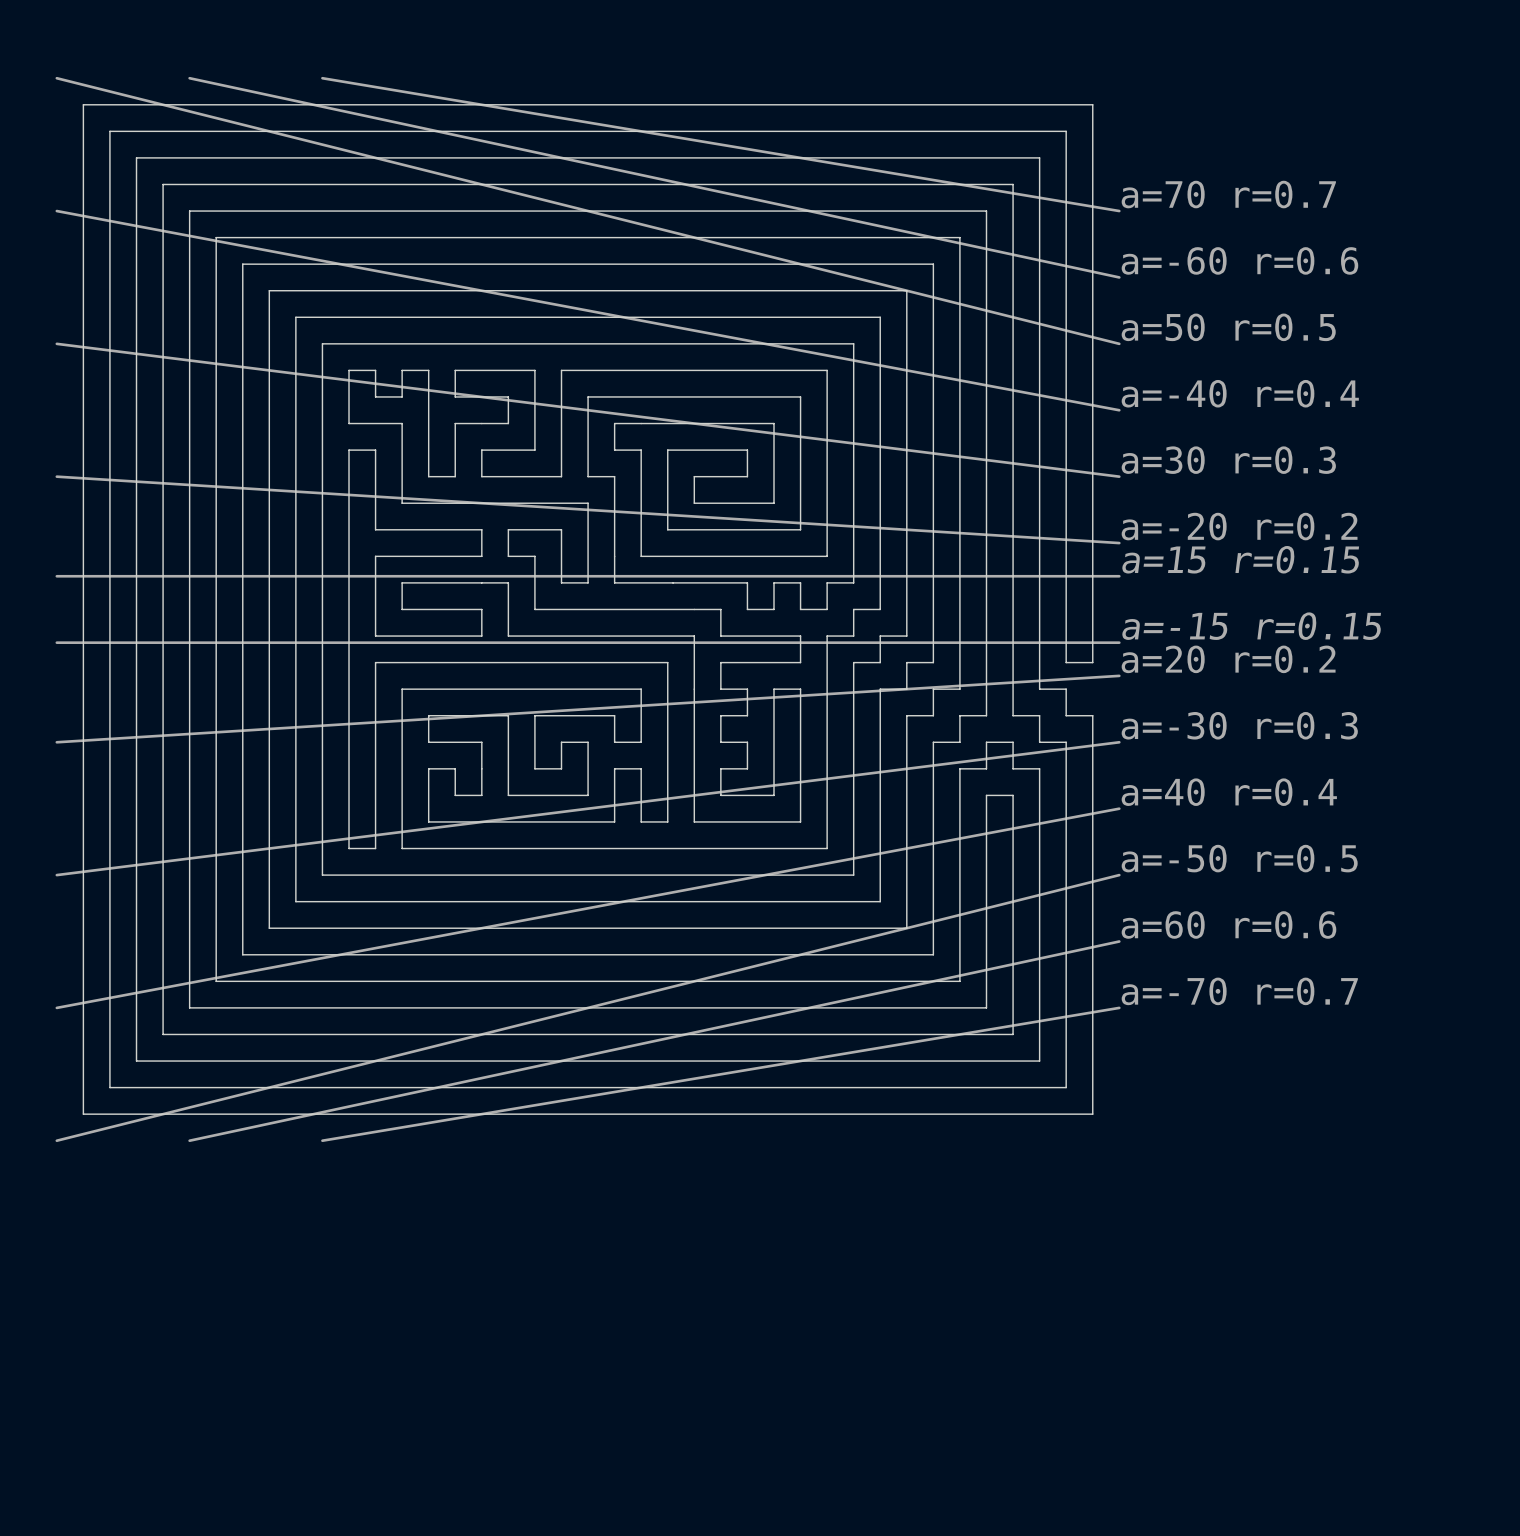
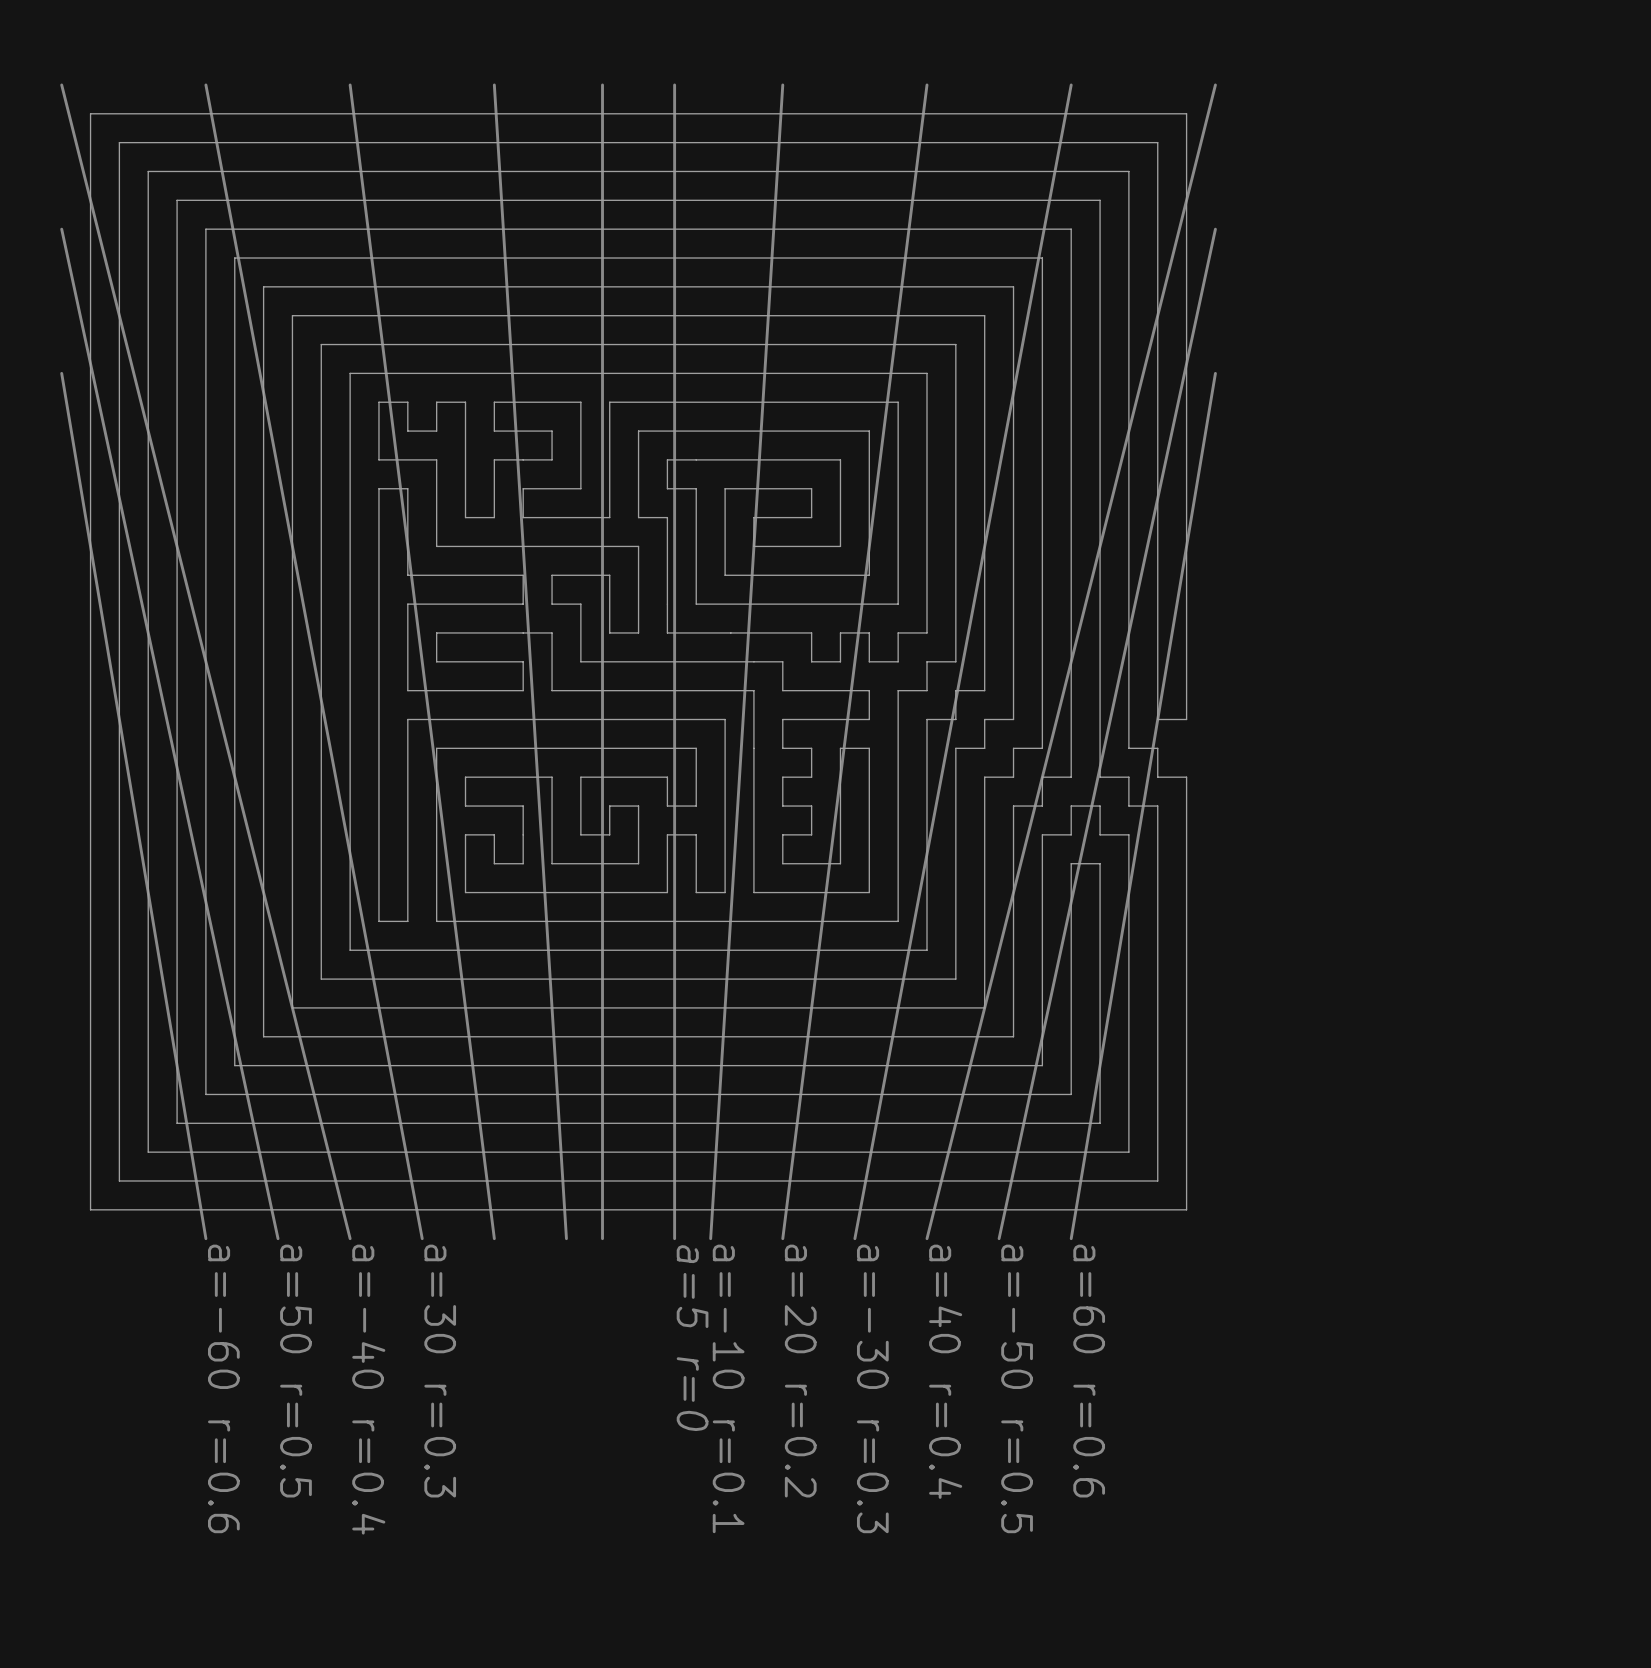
line: (56, 78) (1119, 343) -> (61, 84) (350, 1238)
line: (189, 78) (1119, 277) -> (205, 84) (422, 1238)
line: (322, 78) (1119, 211) -> (350, 84) (494, 1238)
line: none -> (494, 84) (566, 1238)
line: none -> (602, 84) (602, 1238)
line: none -> (674, 84) (674, 1238)
line: none -> (782, 84) (710, 1238)
line: none -> (927, 84) (782, 1238)
line: none -> (1071, 84) (854, 1238)
line: none -> (1215, 84) (927, 1238)
text: a=70 r=0.7 (1228, 194) -> none
line: (56, 211) (1119, 410) -> (61, 229) (278, 1238)
line: none -> (1215, 229) (999, 1238)
text: a=-60 r=0.6 (1239, 260) -> none
text: a=50 r=0.5 (1228, 327) -> none
line: (56, 343) (1119, 476) -> (61, 373) (205, 1238)
line: none -> (1215, 373) (1071, 1238)
text: a=-40 r=0.4 (1240, 393) -> none
text: a=30 r=0.3 (1228, 460) -> none
line: (56, 476) (1119, 543) -> none
text: a=-20 r=0.2 (1239, 526) -> none
text: a=15 r=0.15 (1240, 559) -> none
line: (56, 576) (1119, 576) -> none
text: a=-15 r=0.15 (1251, 626) -> none
line: (56, 642) (1119, 642) -> none
text rotation: 0° (1228, 659) -> 90° clockwise (800, 1371)
text position: a=20 r=0.2 (1228, 659) -> a=20 r=0.2 (800, 1371)
line: (1119, 675) (56, 742) -> none
text rotation: 0° (1239, 725) -> 90° clockwise (872, 1388)
text position: a=-30 r=0.3 (1239, 725) -> a=-30 r=0.3 (872, 1388)
line: (1119, 742) (56, 875) -> none
text rotation: 0° (1229, 792) -> 90° clockwise (945, 1371)
text position: a=40 r=0.4 (1229, 792) -> a=40 r=0.4 (945, 1371)
line: (1119, 808) (56, 1007) -> none
text rotation: 0° (1239, 858) -> 90° clockwise (1017, 1388)
text position: a=-50 r=0.5 (1239, 858) -> a=-50 r=0.5 (1017, 1388)
line: (1119, 875) (56, 1140) -> none
text rotation: 0° (1228, 924) -> 90° clockwise (1089, 1371)
text position: a=60 r=0.6 (1228, 924) -> a=60 r=0.6 (1089, 1371)
line: (1119, 941) (189, 1140) -> none
text: a=-70 r=0.7 (1239, 991) -> none
line: (1119, 1007) (322, 1140) -> none
text: none -> a=5 r=0 (692, 1338)
text: none -> a=50 r=0.5 (295, 1371)
text: none -> a=30 r=0.3 (440, 1371)
text: none -> a=-60 r=0.6 (223, 1388)
text: none -> a=-40 r=0.4 (368, 1389)
text: none -> a=-10 r=0.1 (728, 1388)

